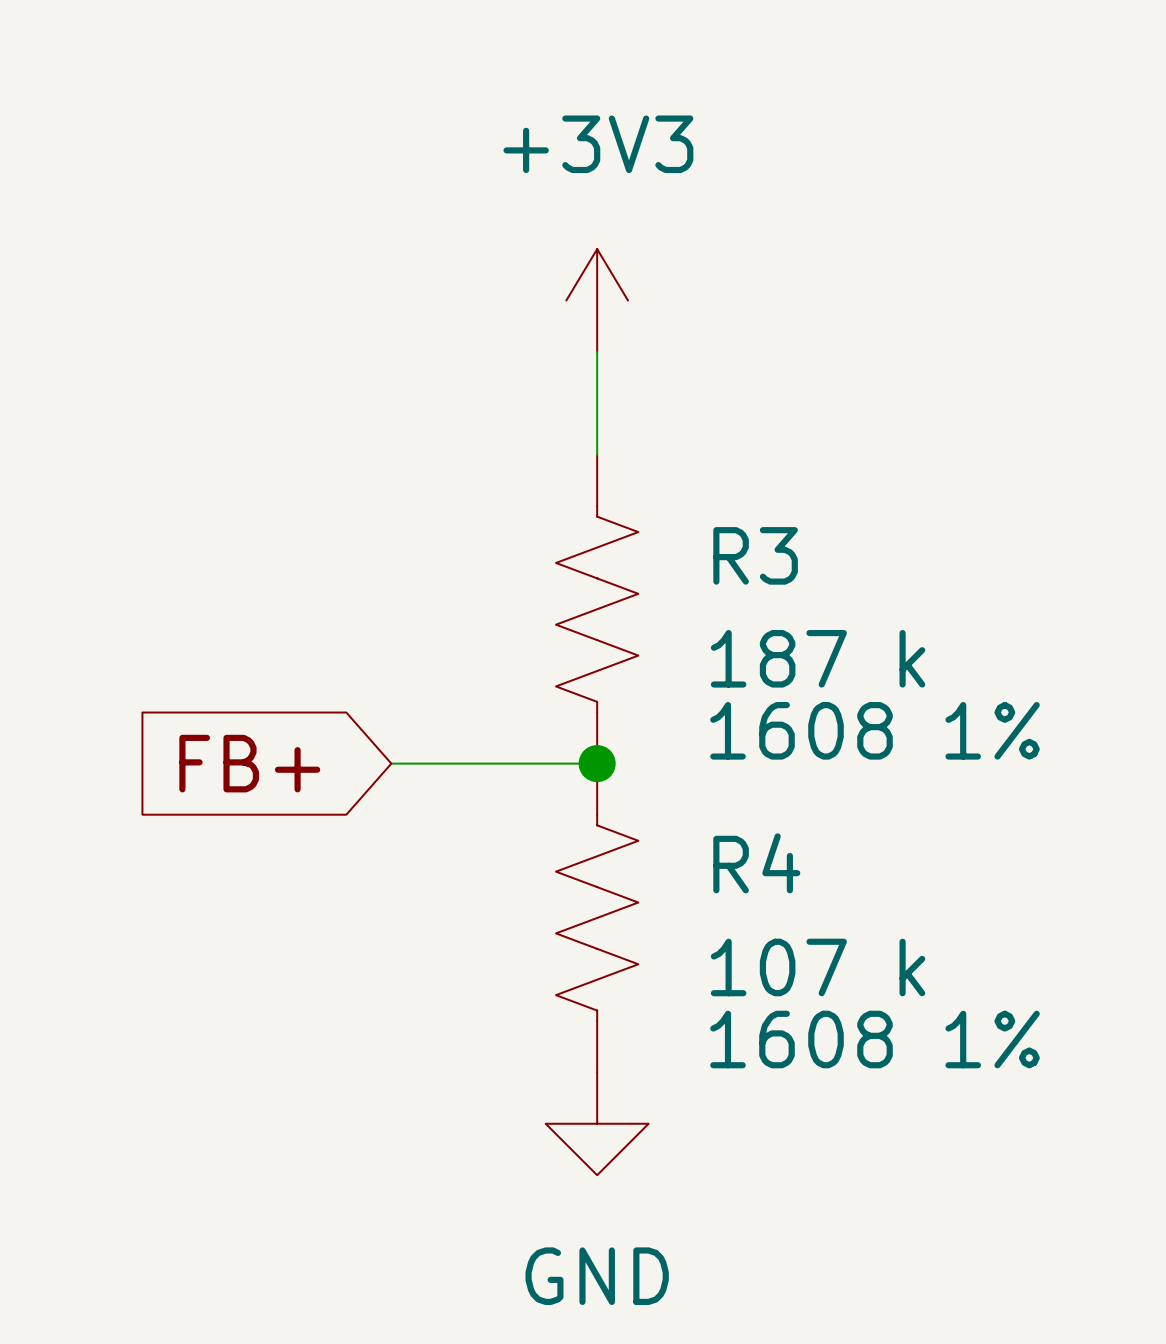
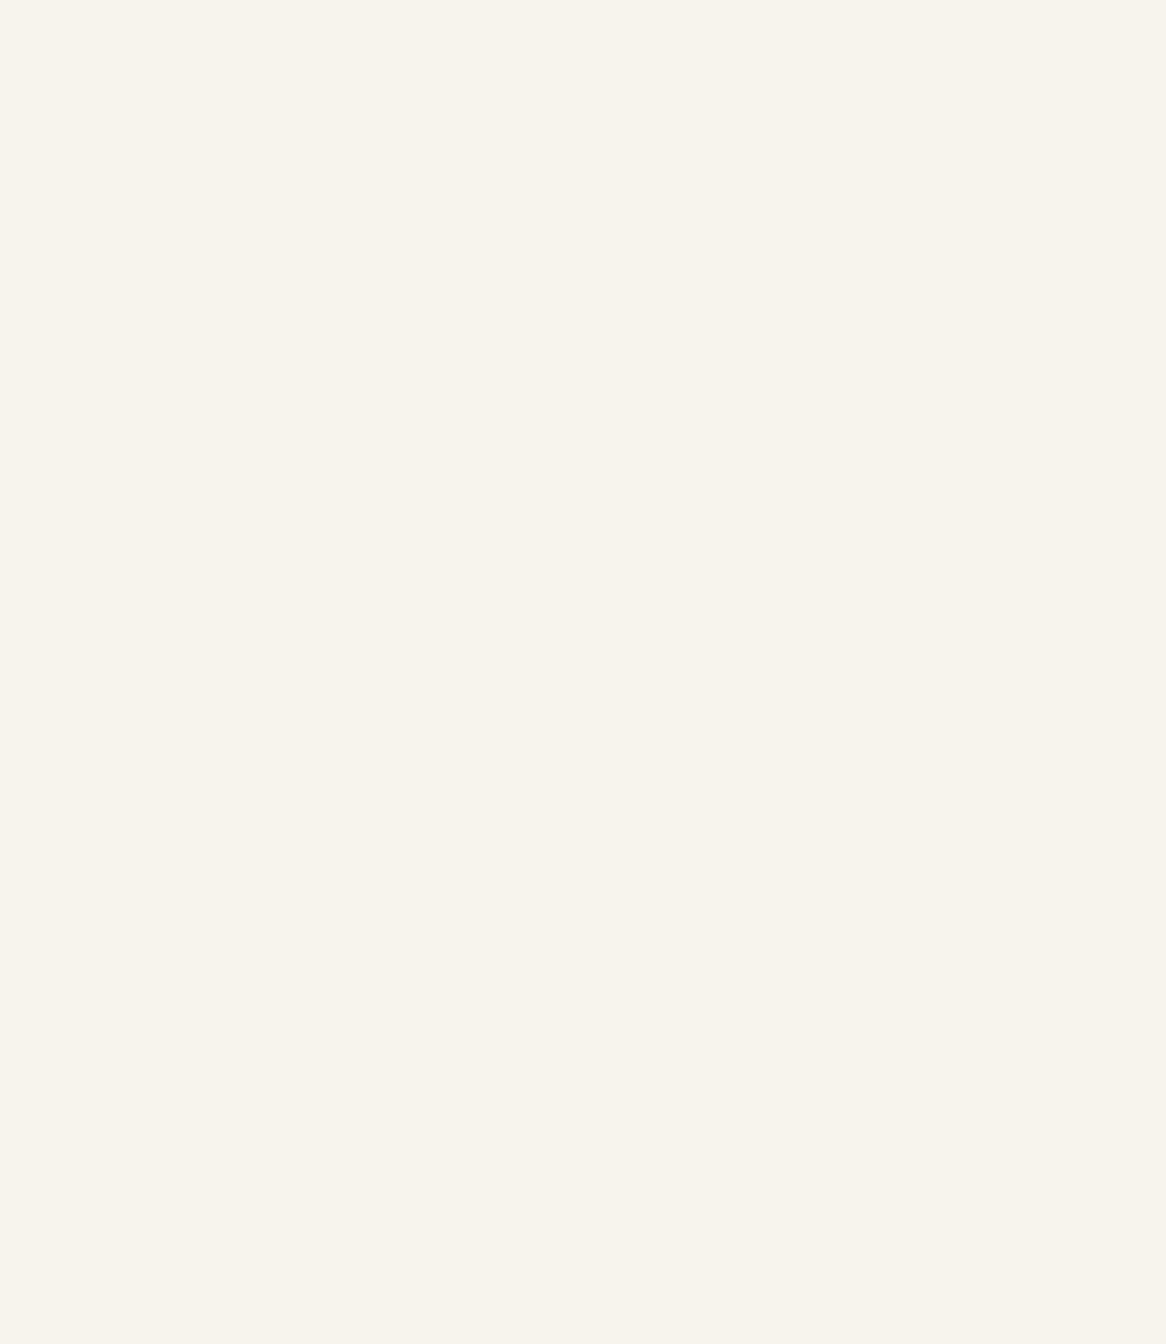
power symbol: +3V3 (597, 300) -> none
wire: (597, 352) (597, 454) -> none
R3: 187 k (597, 609) -> none
global label: FB+ (249, 763) -> none
wire: (391, 763) (597, 763) -> none
junction: (597, 763) -> none
R4: 107 k (597, 917) -> none
power symbol: GND (597, 1123) -> none

